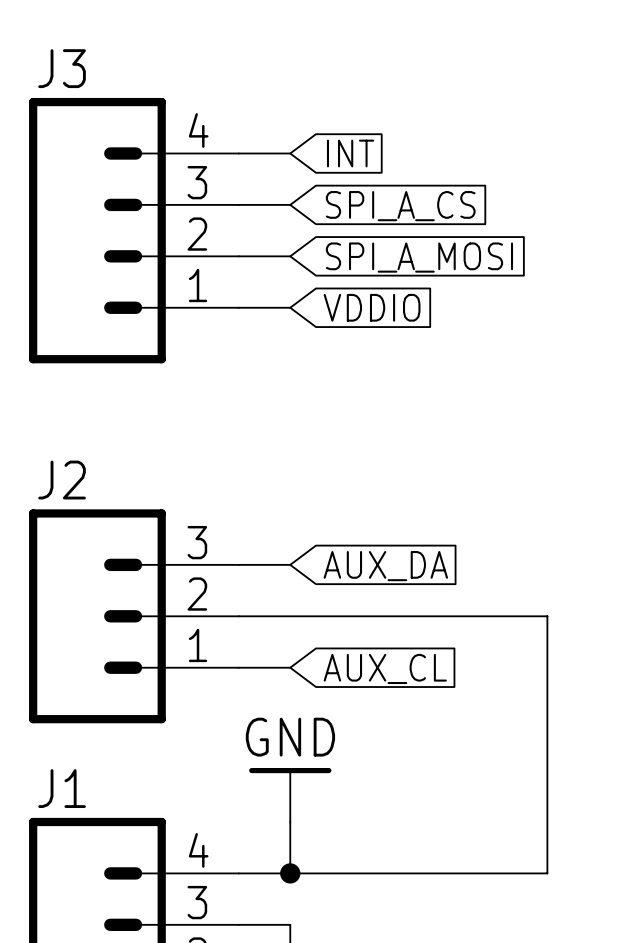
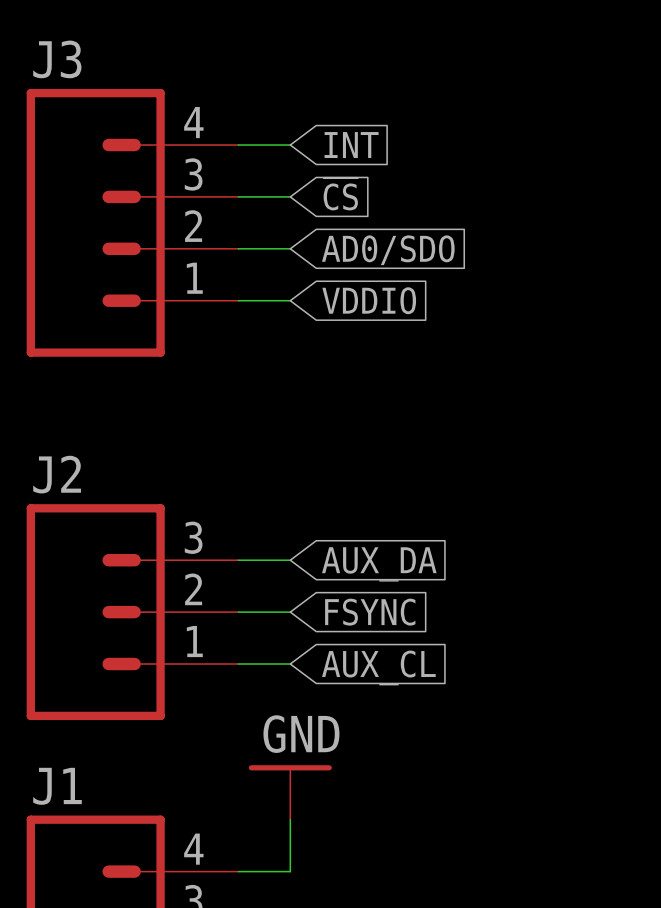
global label: SPI_A_CS (400, 206) -> ~{CS} (340, 194)
global label: SPI_A_MOSI (419, 257) -> AD0/SDO (388, 250)
wire: (290, 616) (547, 616) (547, 873) (290, 873) -> none
global label: none -> FSYNC (370, 612)
junction: (290, 873) -> none

